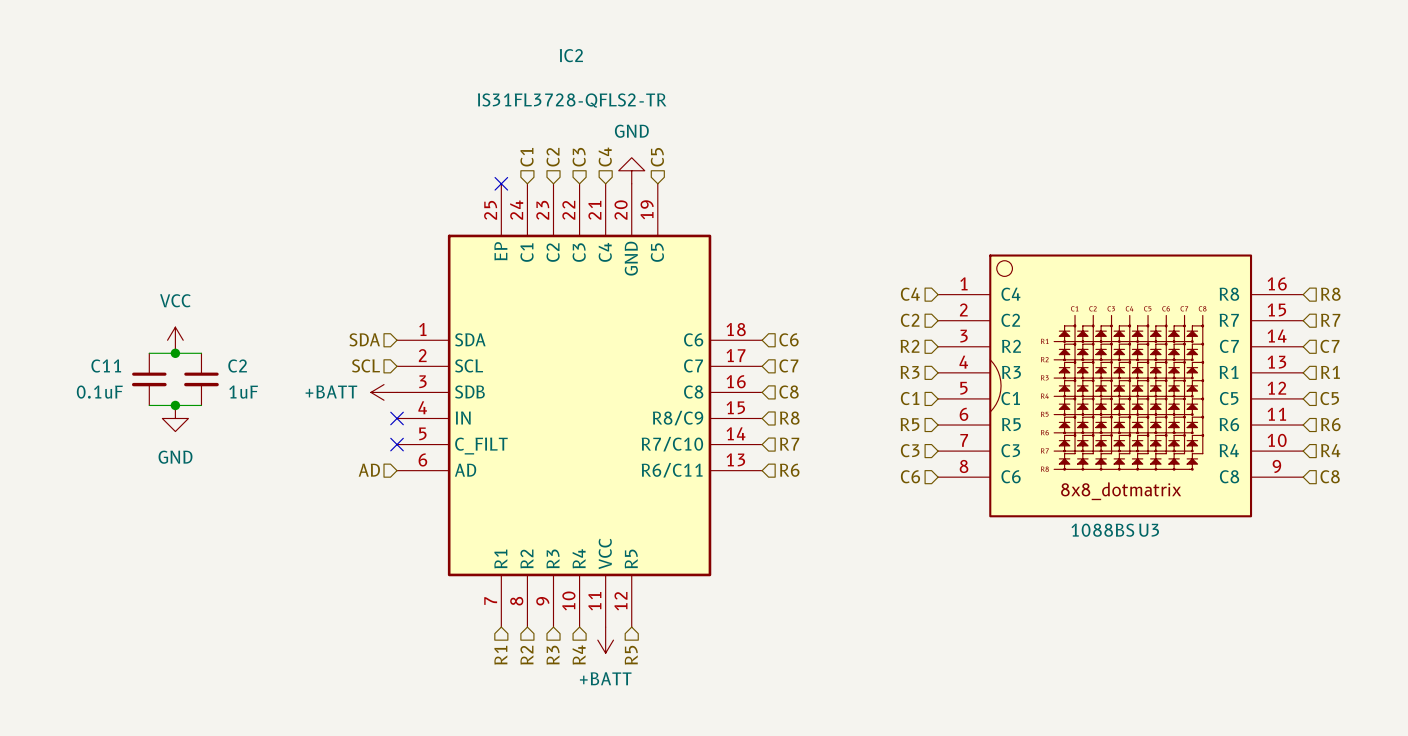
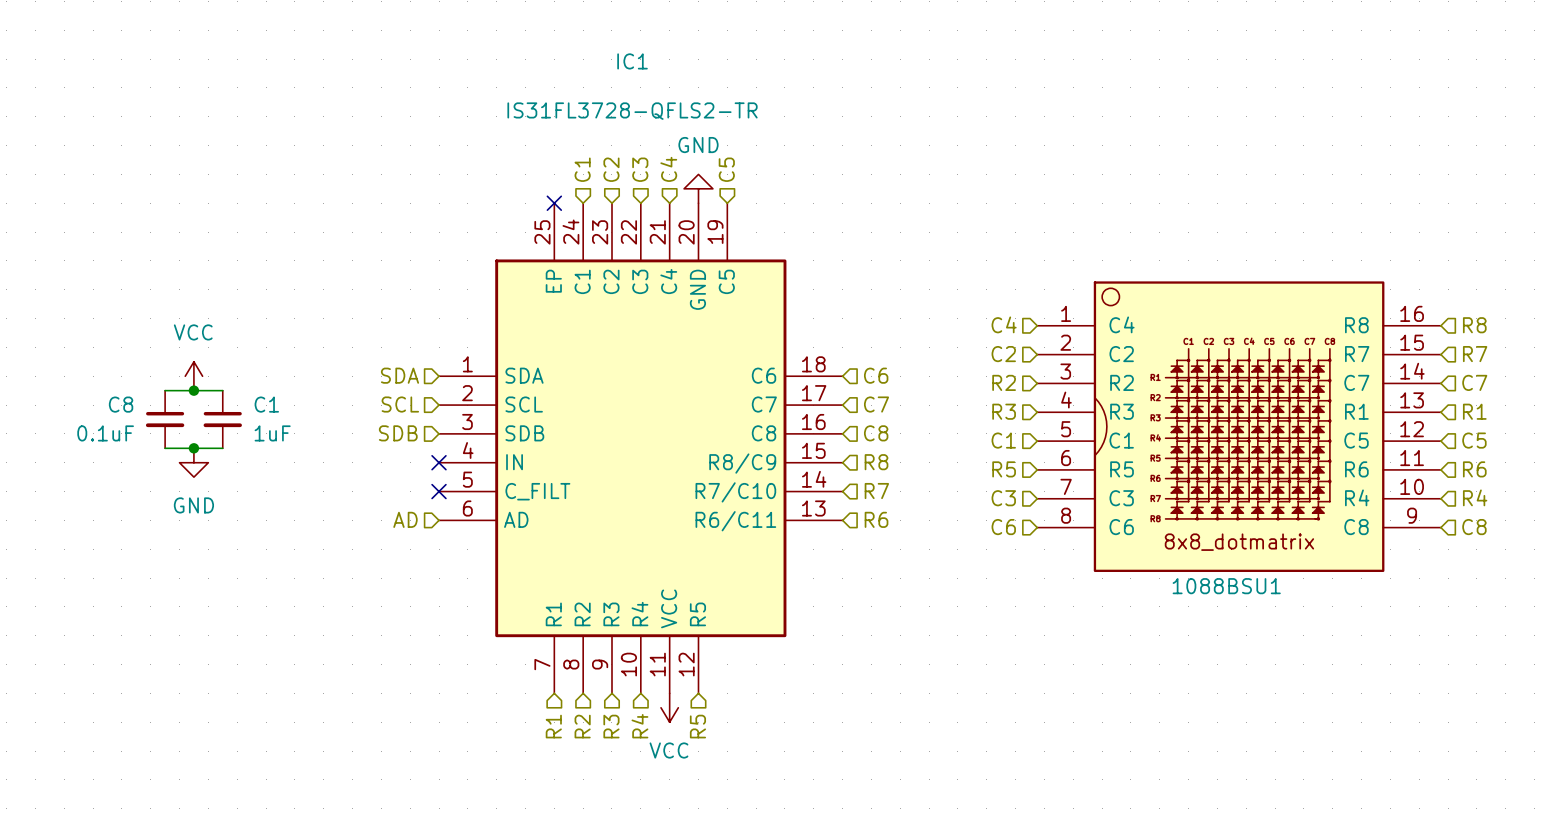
IC2 name: IC2 (571, 55) -> IC1 (632, 61)
C11 name: C11 (106, 365) -> C8 (121, 404)
C2 name: C2 (237, 366) -> C1 (266, 404)
hierarchical label: none -> SDB (398, 433)
power symbol: +BATT (384, 392) -> none
U3 name: U3 (1149, 530) -> U1 (1268, 586)
power symbol: +BATT (605, 640) -> VCC (669, 707)

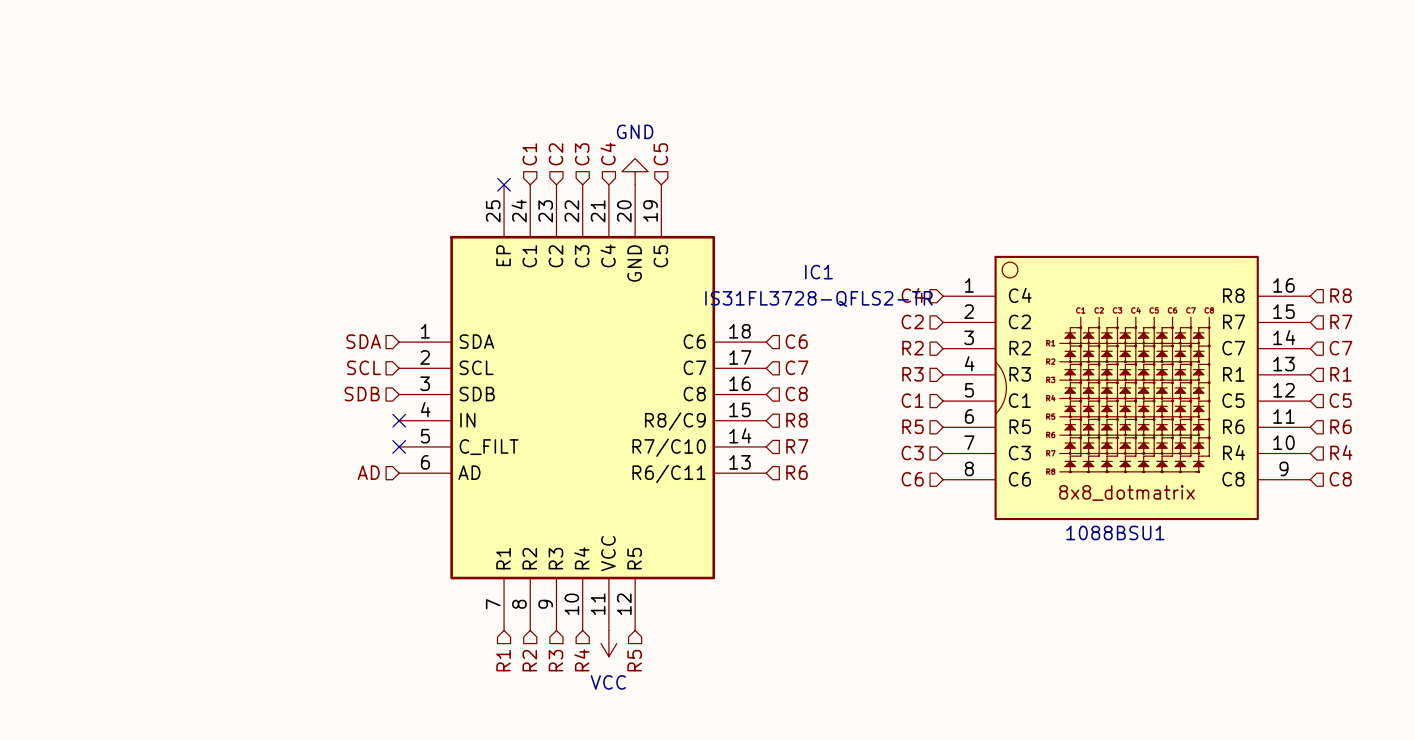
IC1 name position: IC1 (632, 61) -> IC1 (818, 272)
IC1 value position: IS31FL3728-QFLS2-TR (632, 111) -> IS31FL3728-QFLS2-TR (818, 298)
power symbol: VCC (193, 376) -> none
wire: (165, 390) (222, 390) -> none
junction: (193, 390) -> none
C8: 0.1uF (165, 419) -> none
C1: 1uF (222, 419) -> none
wire: (165, 448) (222, 448) -> none
junction: (193, 448) -> none
power symbol: GND (193, 462) -> none

